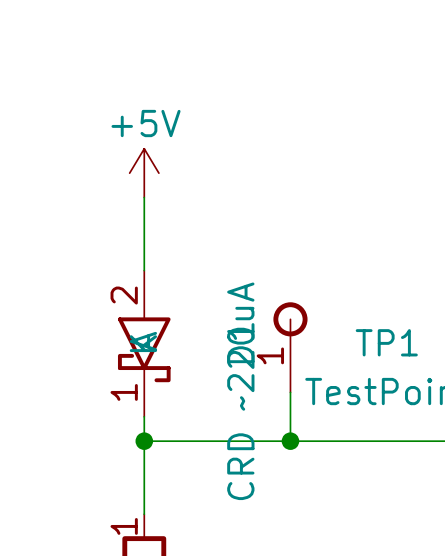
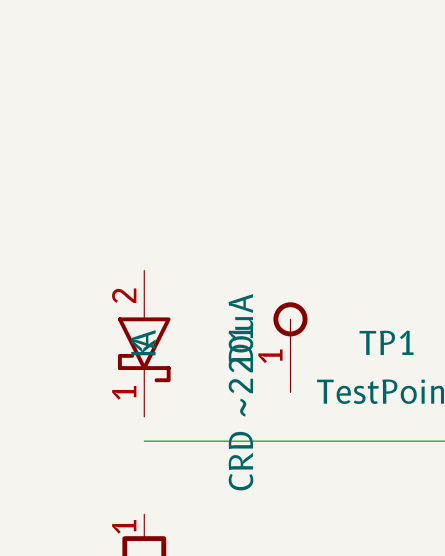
power symbol: +5V (144, 173) -> none
wire: (144, 197) (144, 270) -> none
wire: (290, 392) (290, 441) -> none
wire: (144, 416) (144, 514) -> none
junction: (144, 441) -> none
junction: (290, 441) -> none

